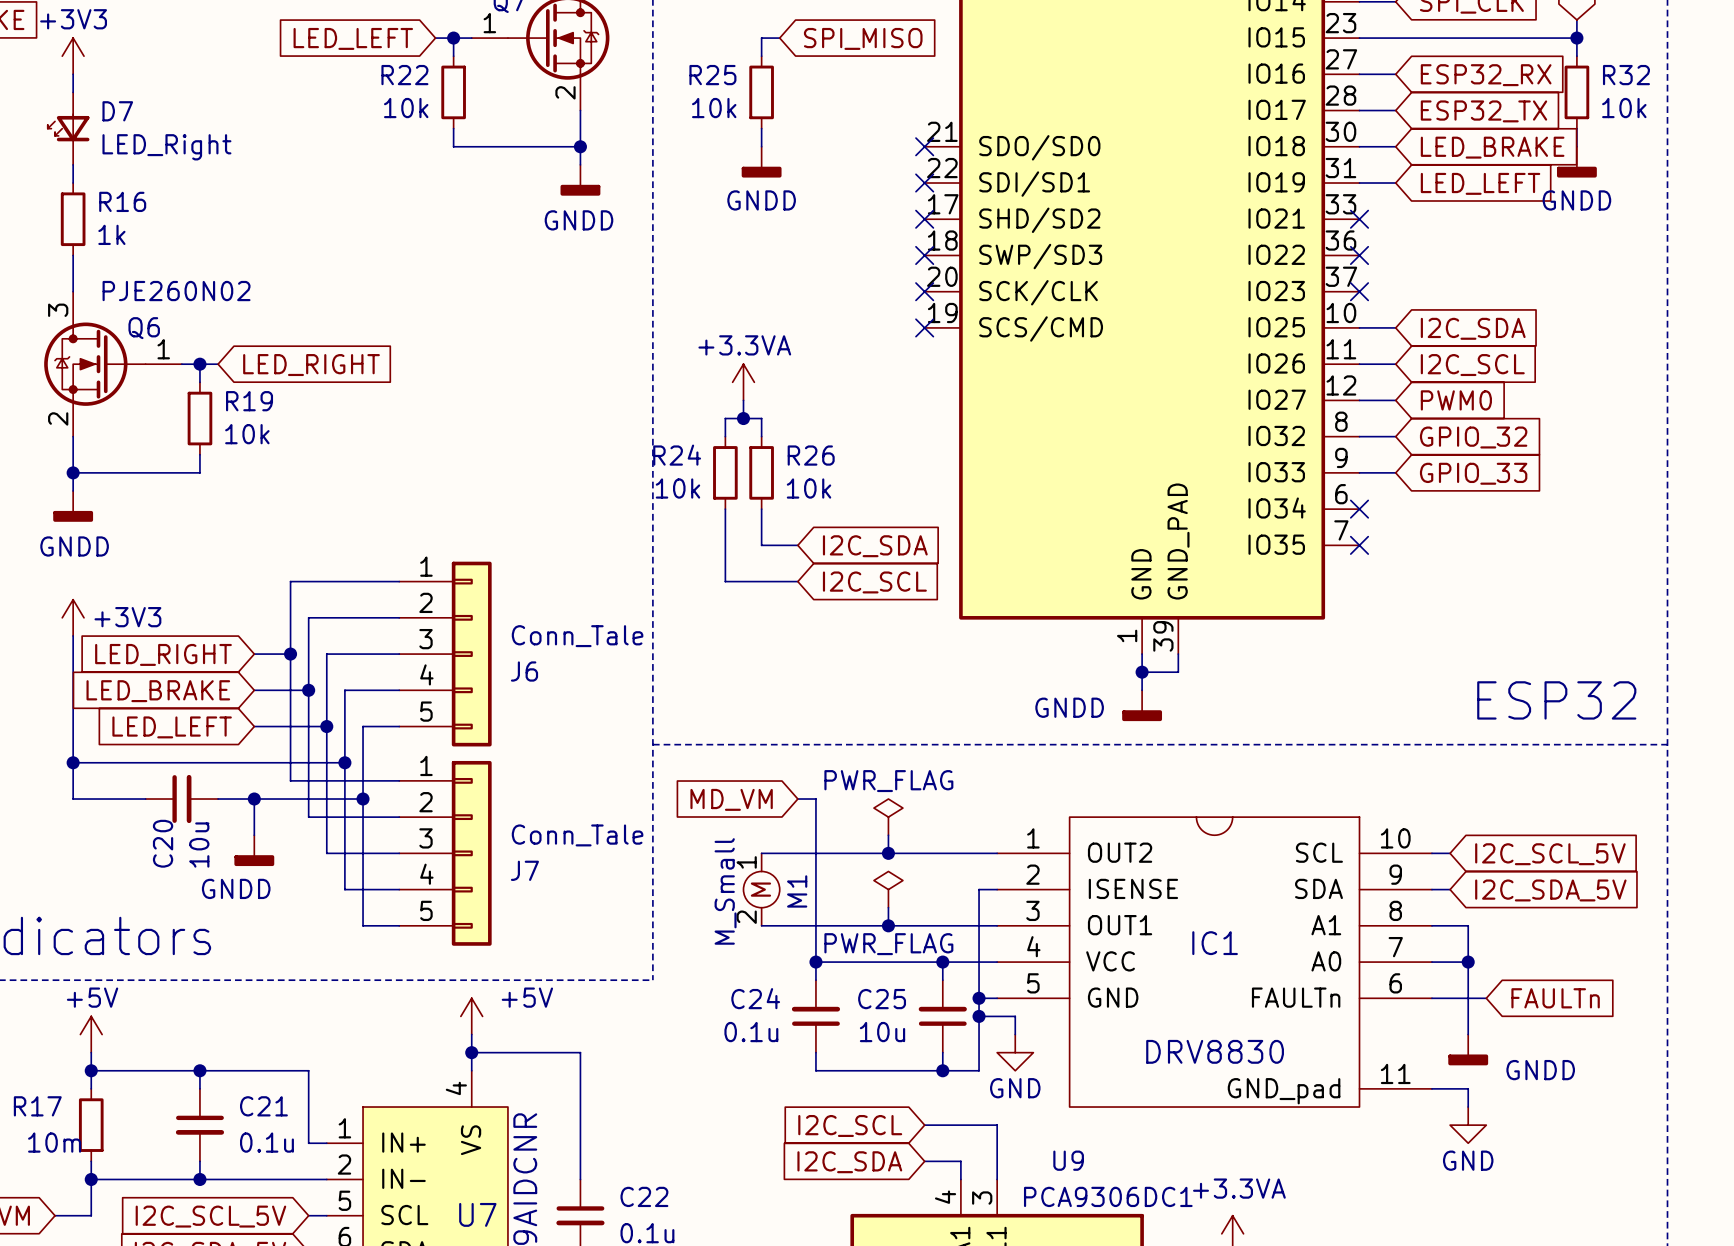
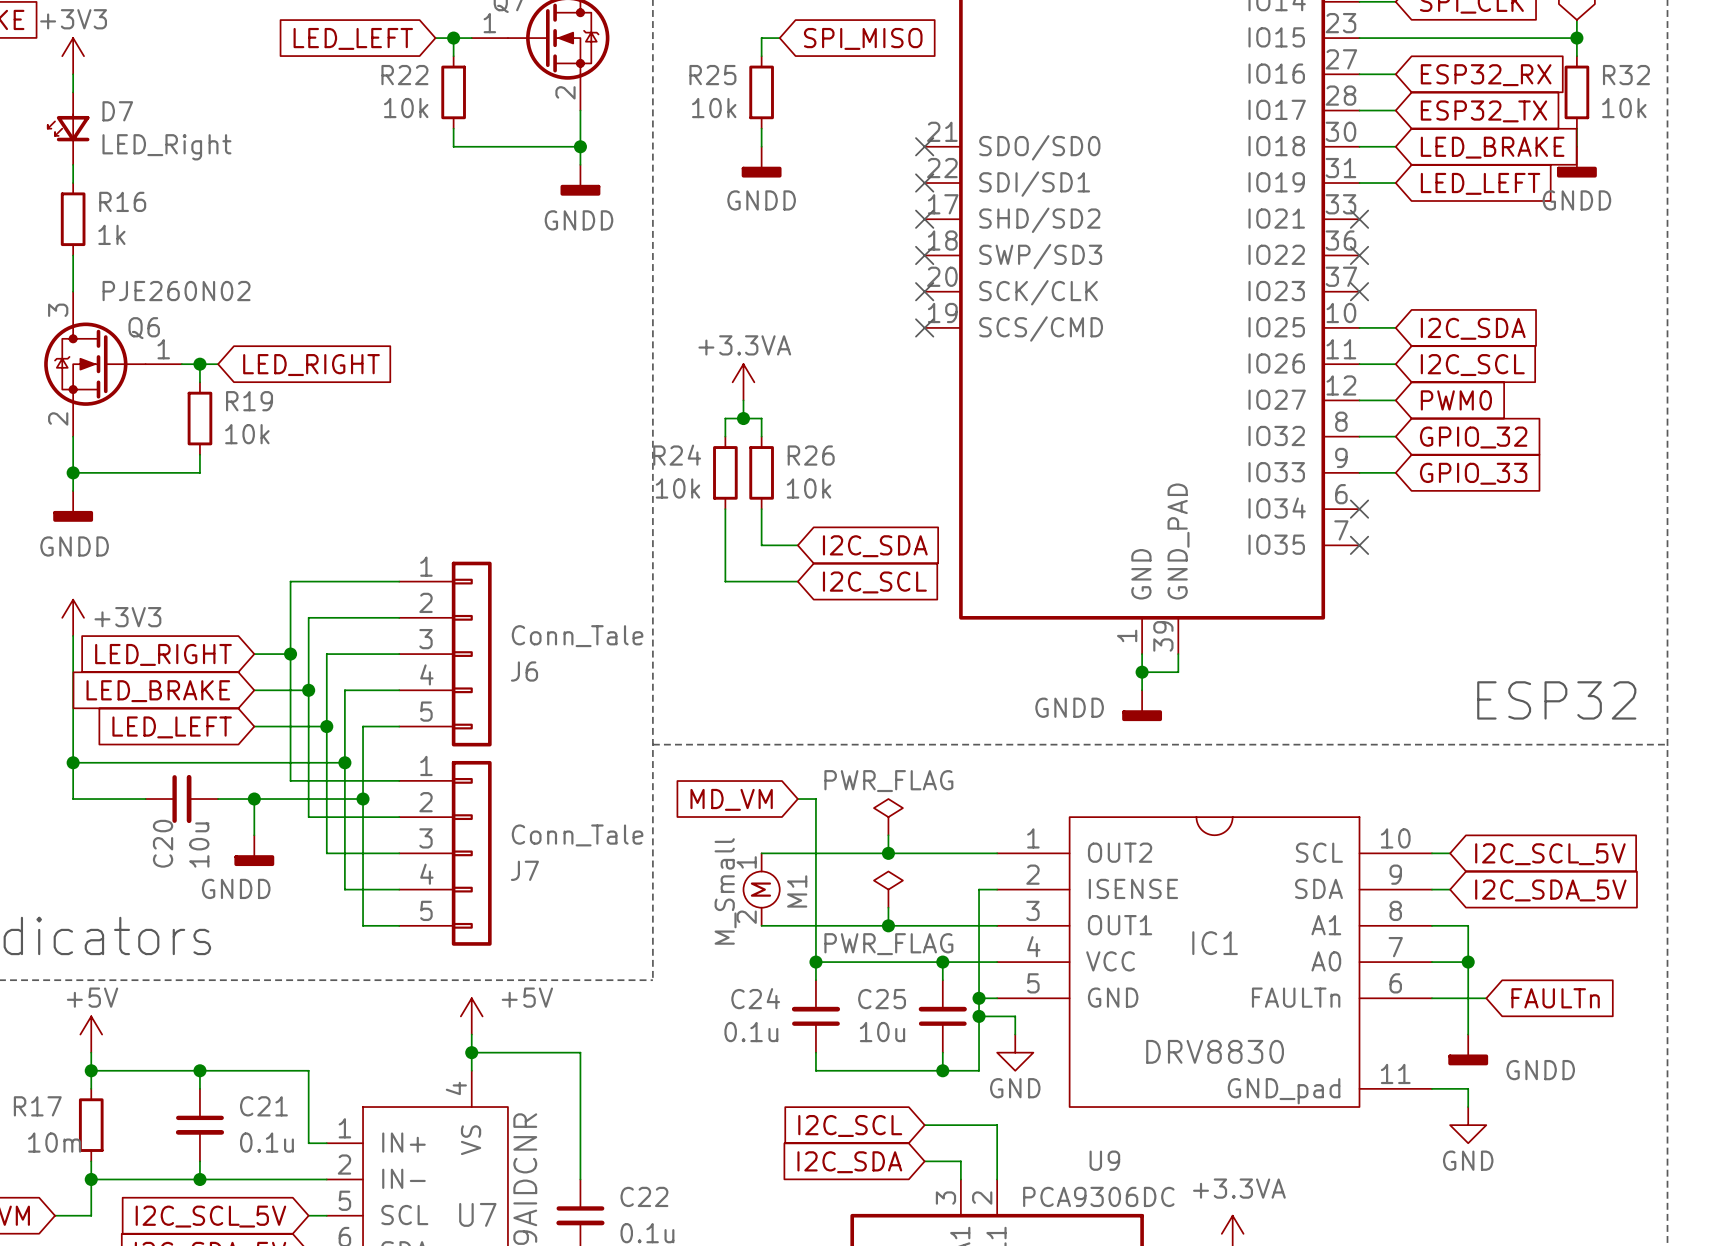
U9 name position: U9 (1068, 1160) -> U9 (1104, 1160)
U9 value: PCA9306DC1 (1108, 1196) -> PCA9306DC (1098, 1196)
U9 pin number: 4 (945, 1197) -> 3 (945, 1198)
U9 pin number: 3 (982, 1198) -> 2 (982, 1198)

